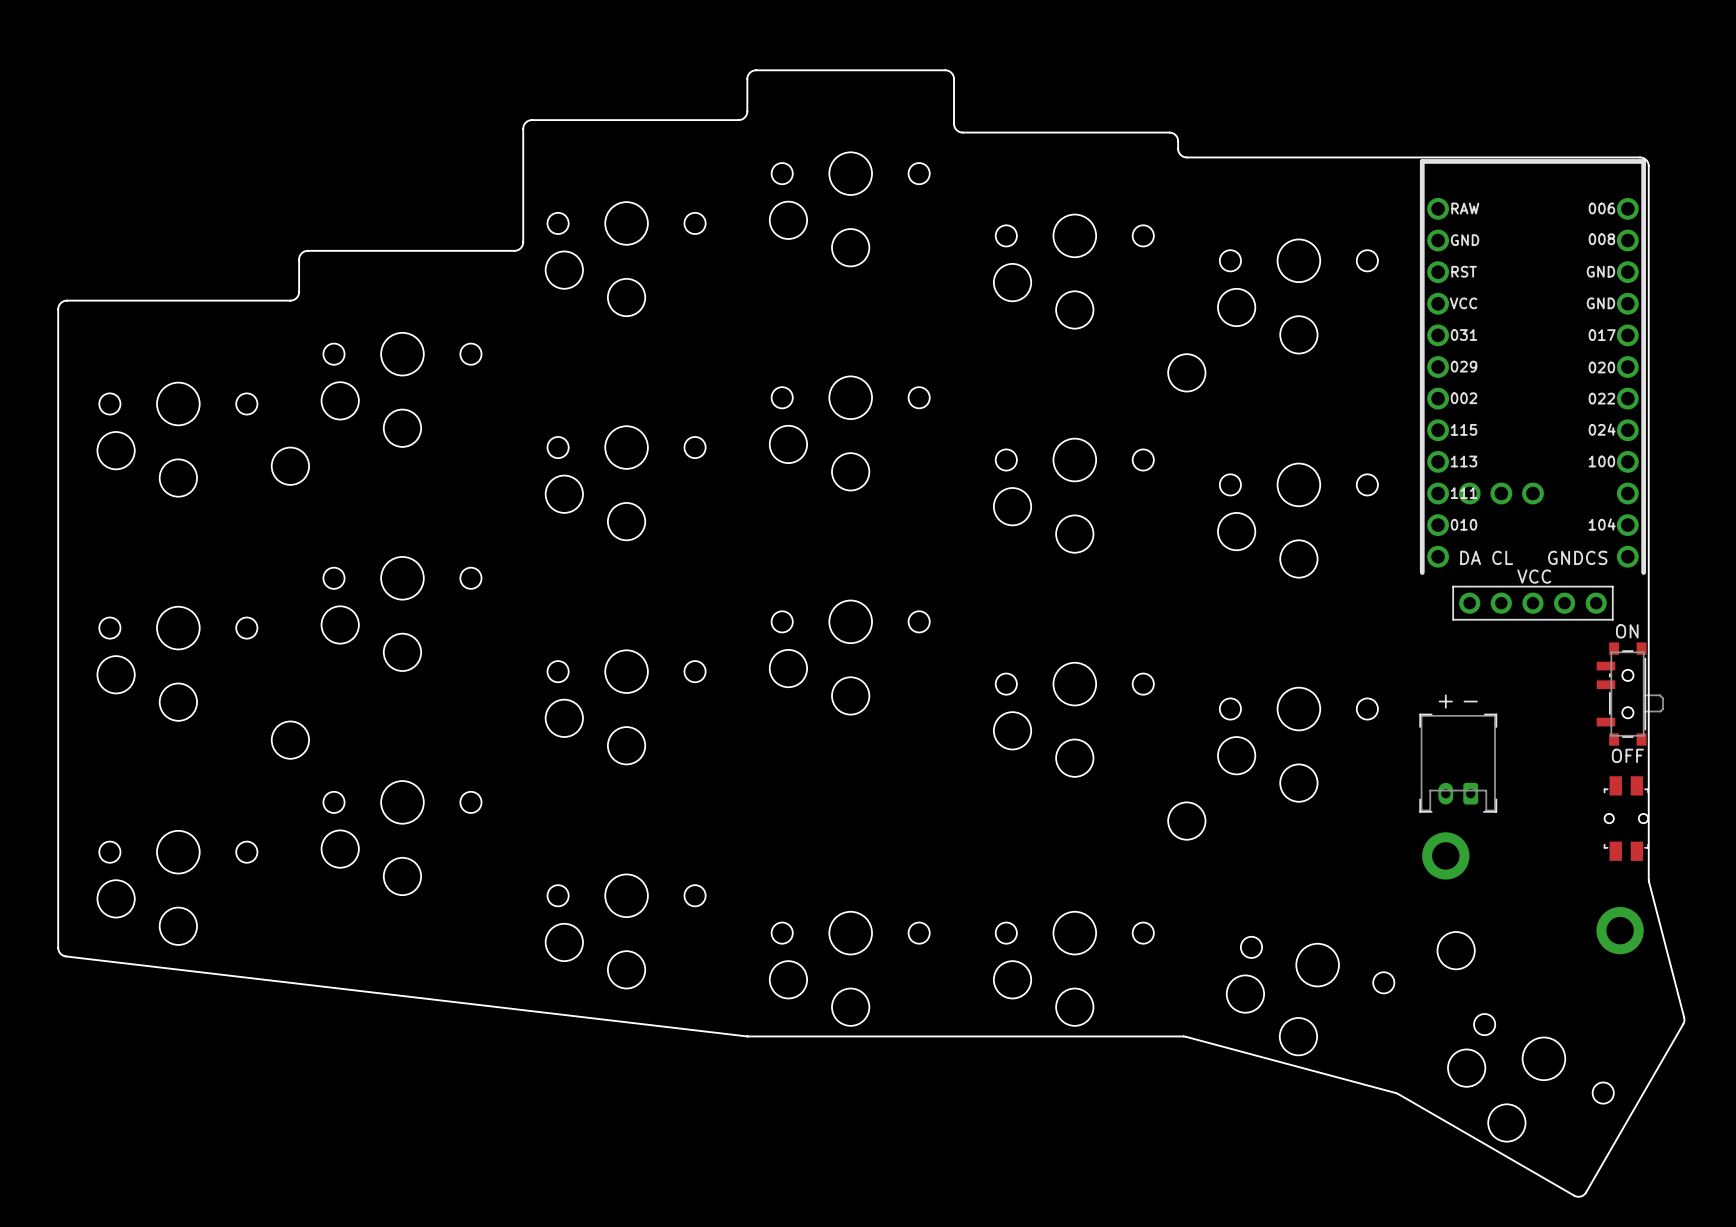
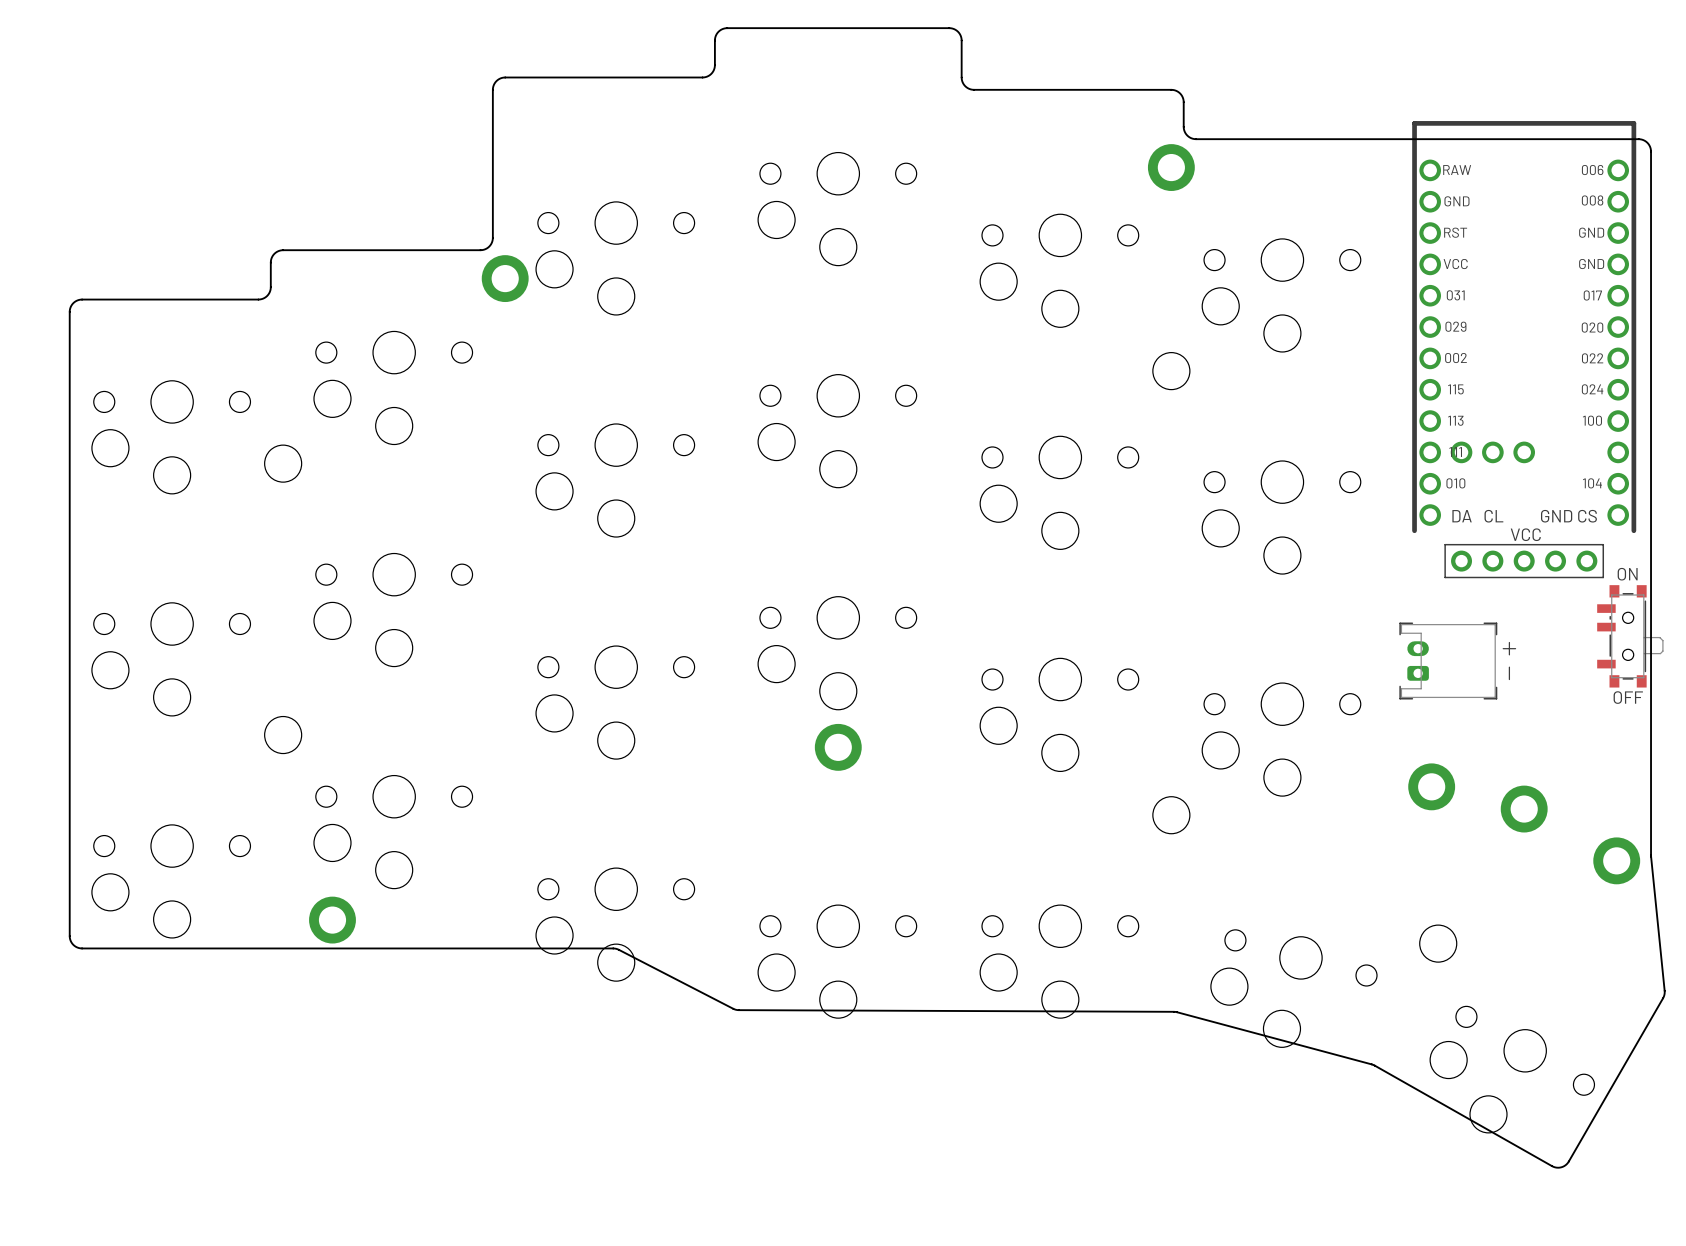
part: none -> (1171, 167)
board edge: (307, 250) (302, 252) (299, 257) (299, 291) (297, 297) (291, 300) (265, 300) -> (300, 250) (281, 250) (273, 255) (270, 260) (270, 290) (265, 297) (258, 299)
board edge: (489, 250) (515, 250) (522, 244) (523, 128) (526, 121) (531, 120) (740, 119) (747, 112) (747, 76) (754, 70) (947, 70) (953, 77) (954, 124) (959, 131) (1170, 132) (1177, 137) (1179, 153) (1185, 157) (1640, 157) (1645, 159) (1648, 166) (1648, 879) (1684, 1019) (1585, 1193) (1579, 1196) (1574, 1195) (1396, 1093) (1184, 1036) (747, 1036) (62, 955) (58, 947) (58, 309) (60, 304) (64, 300) (87, 300) -> (480, 250) (489, 246) (492, 239) (492, 89) (496, 81) (505, 77) (705, 77) (711, 73) (714, 68) (715, 35) (719, 30) (725, 28) (952, 28) (958, 31) (961, 37) (961, 79) (964, 85) (969, 88) (1174, 90) (1180, 93) (1183, 98) (1184, 131) (1188, 136) (1194, 139) (1638, 139) (1646, 141) (1651, 151) (1651, 855) (1664, 993) (1567, 1162) (1561, 1167) (1552, 1166) (1373, 1064) (1175, 1011) (737, 1010) (613, 948) (82, 948) (75, 946) (71, 942) (69, 936) (69, 311) (73, 303) (82, 299)
part: none -> (505, 278)
part position: (1532, 366) -> (1524, 327)
part position: (1532, 603) -> (1524, 561)
part position: (1630, 694) -> (1630, 636)
part: none -> (838, 747)
part rotation: 0° (1458, 753) -> 90° clockwise (1457, 661)
part position: (1458, 753) -> (1457, 661)
part: none -> (1431, 786)
part: none -> (1524, 809)
part: (1626, 818) -> none
part: (1445, 855) -> none
part: none -> (332, 920)
part position: (1620, 930) -> (1616, 860)

